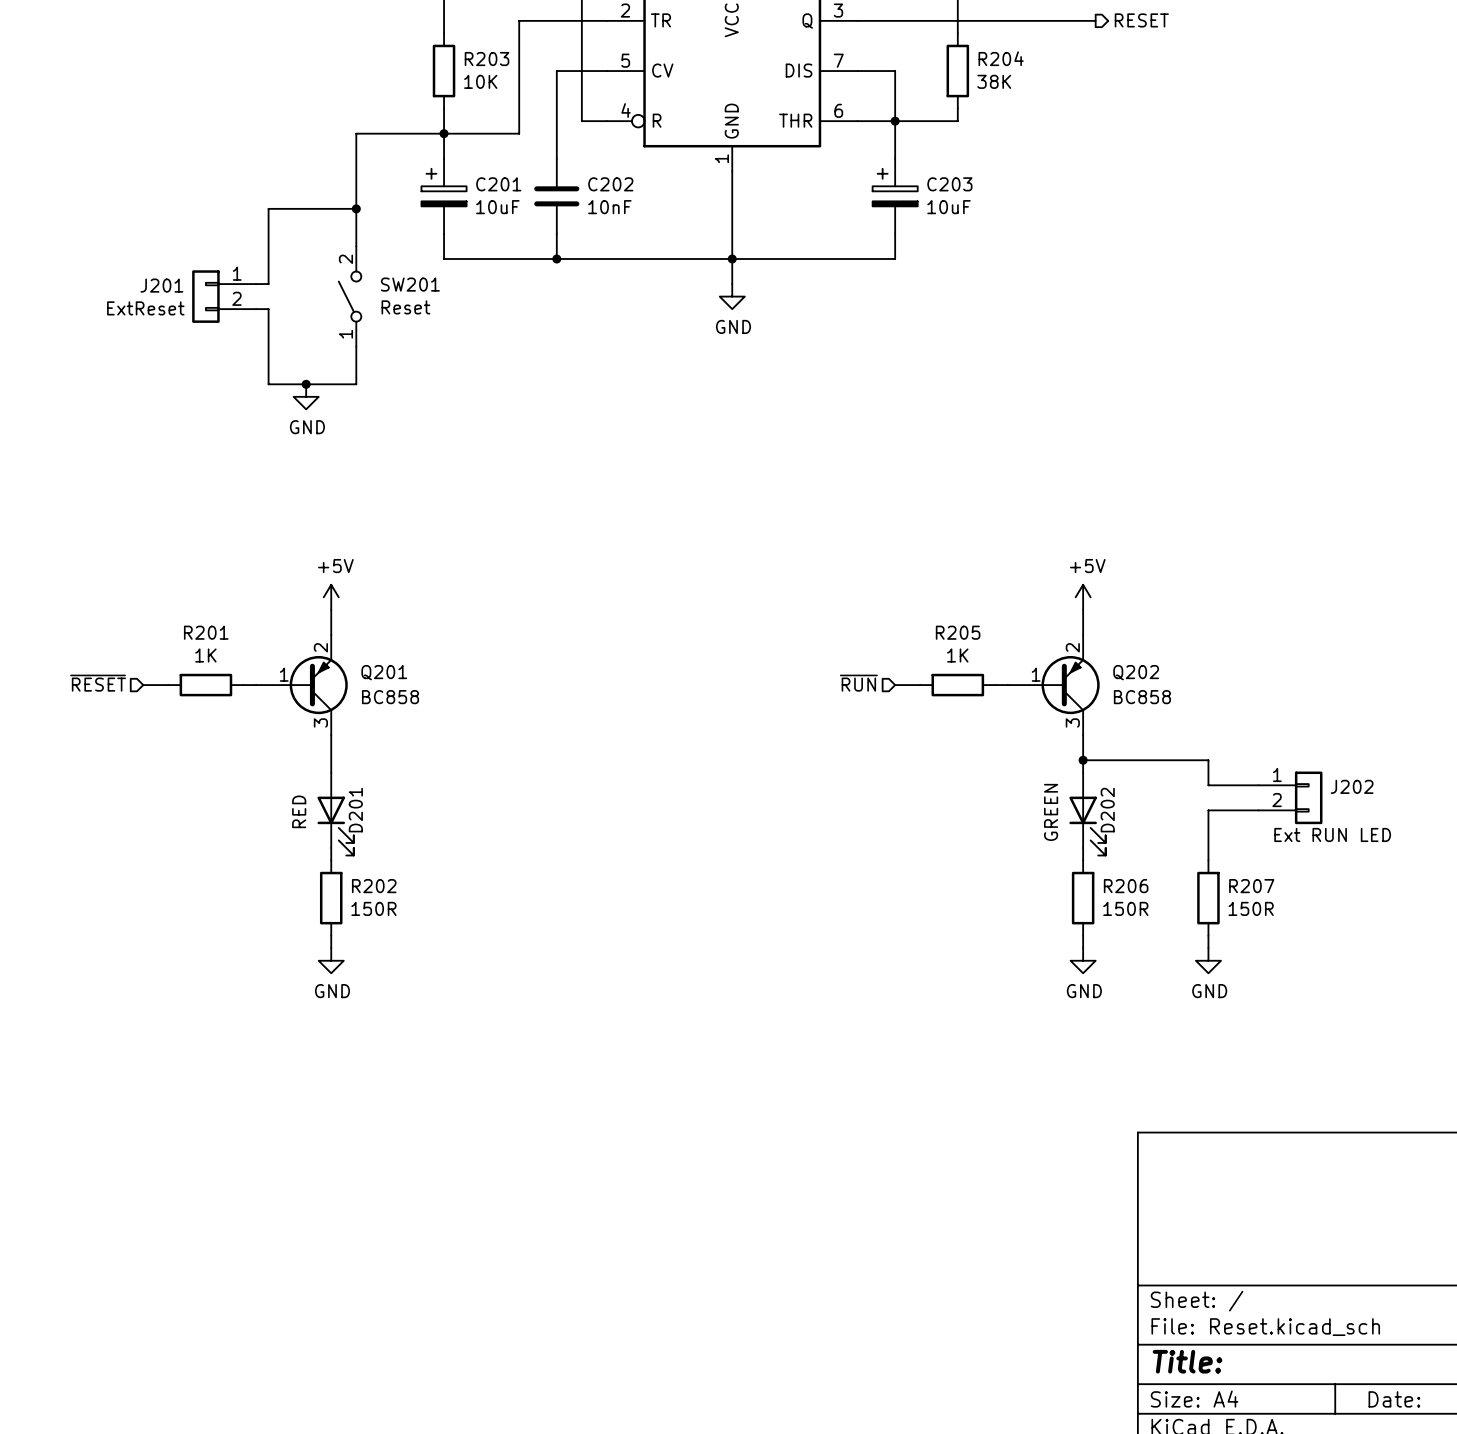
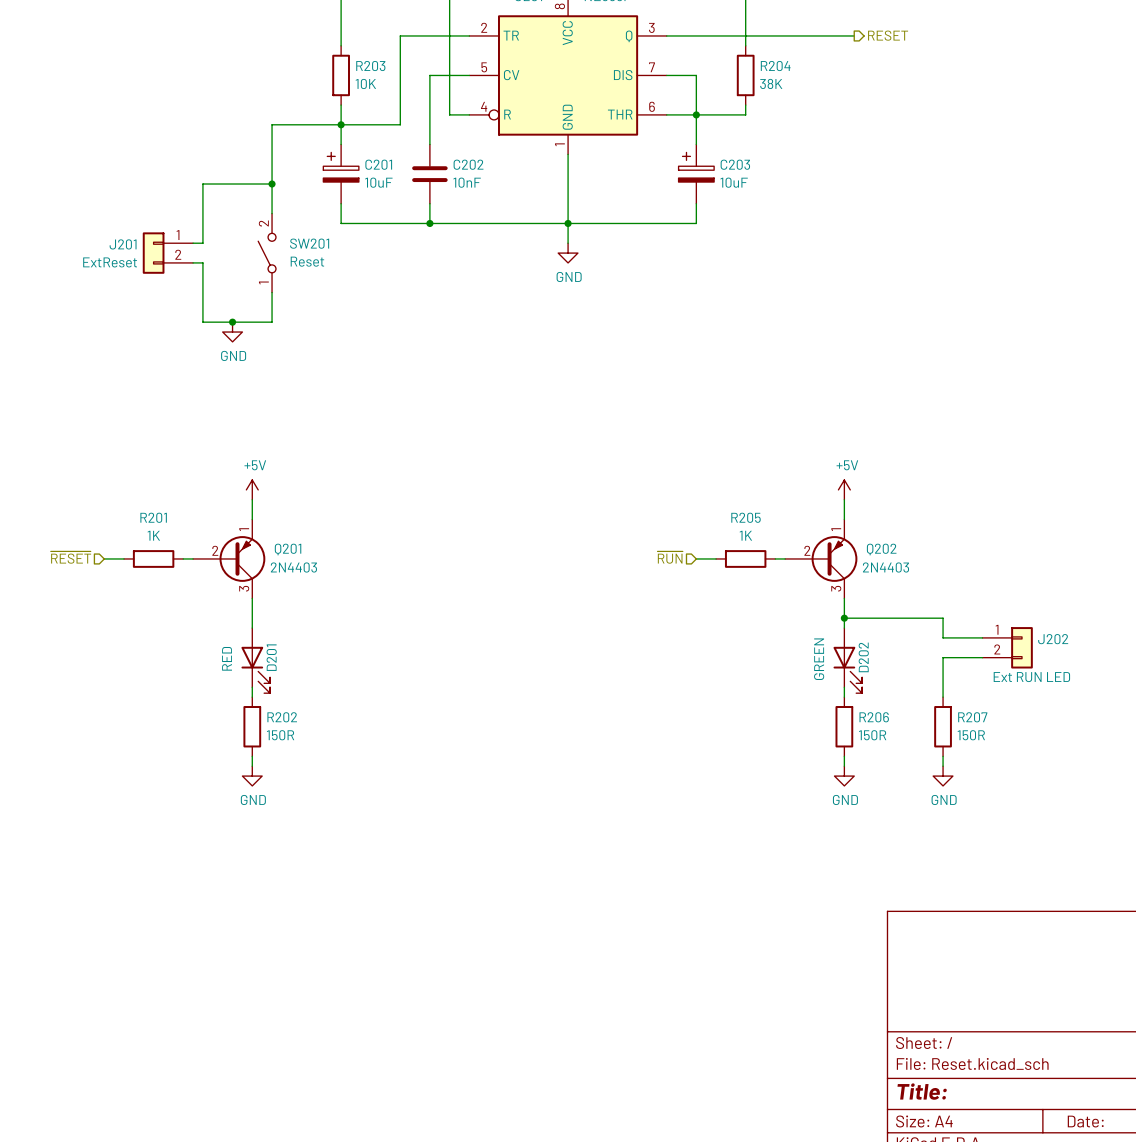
Q201 pin number: 2 (320, 647) -> 1 (244, 529)
Q202 pin number: 2 (1072, 647) -> 1 (836, 529)
Q201 pin number: 1 (284, 674) -> 2 (215, 550)
Q202 pin number: 1 (1036, 674) -> 2 (807, 550)
Q201 value: BC858 (390, 697) -> 2N4403 (293, 567)
Q202 value: BC858 (1142, 697) -> 2N4403 (885, 567)

